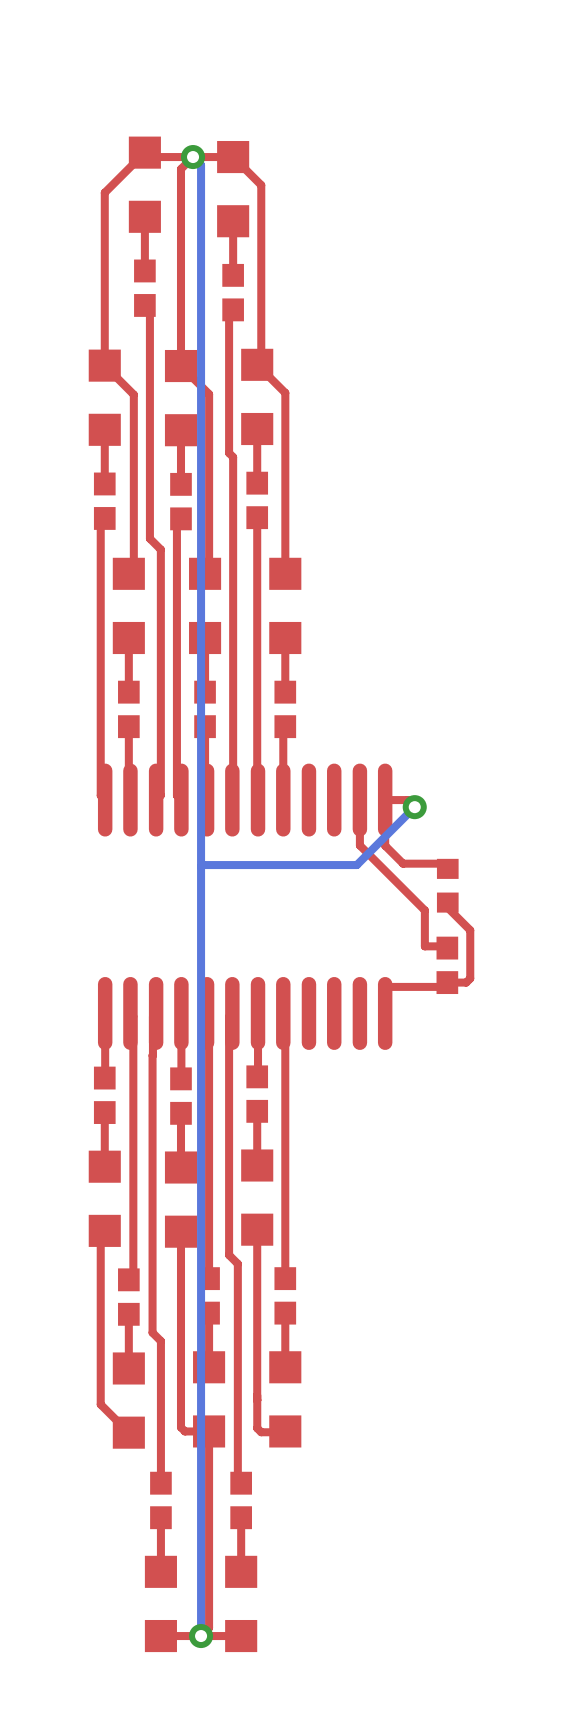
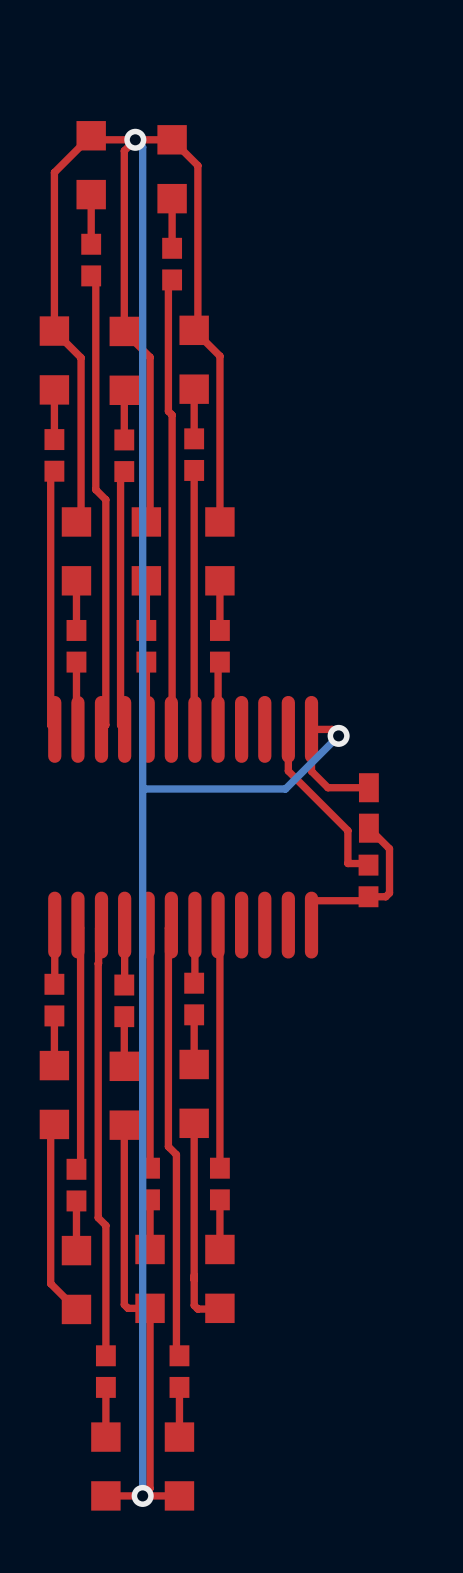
part footprint: [436, 858, 459, 913] -> [358, 773, 379, 843]

